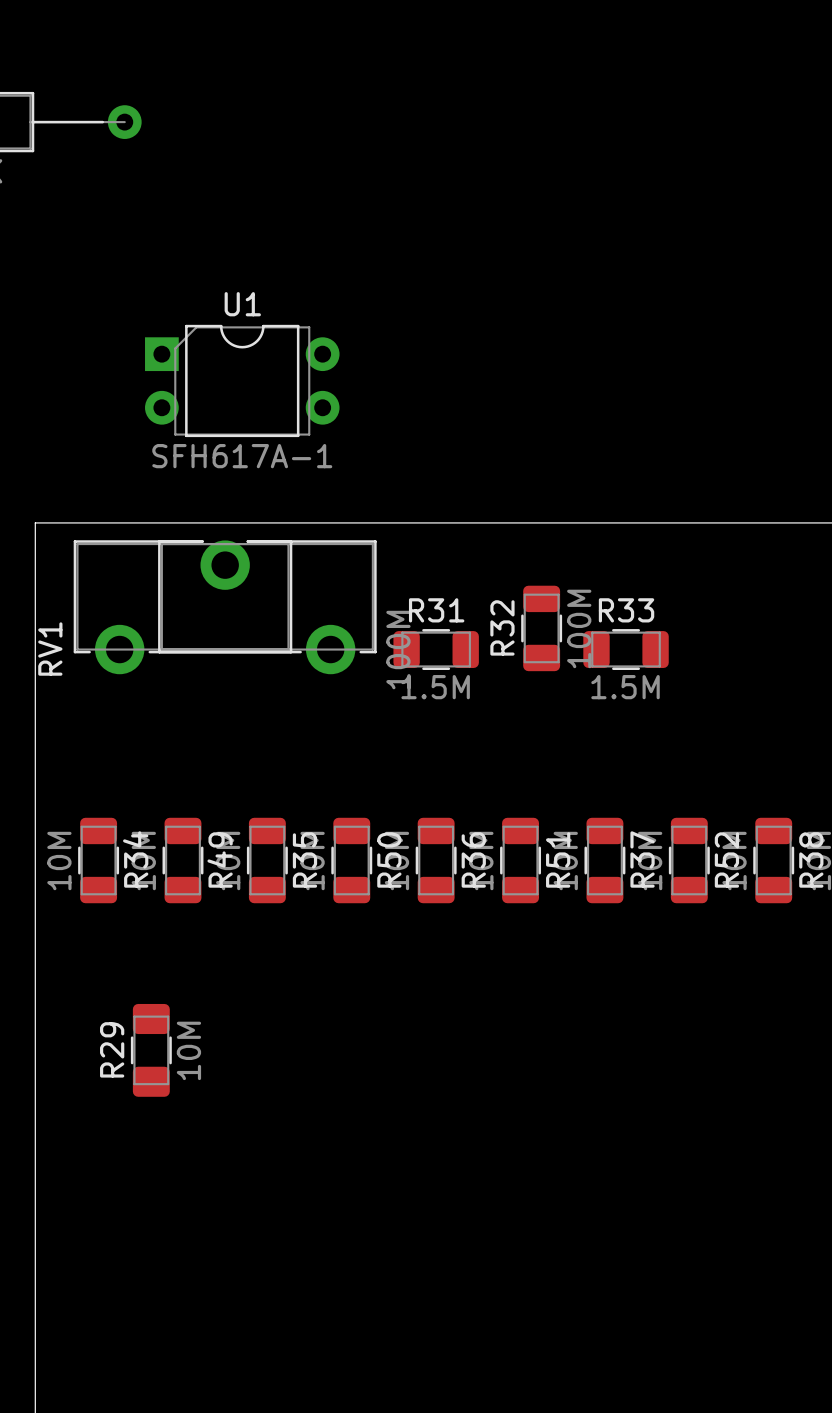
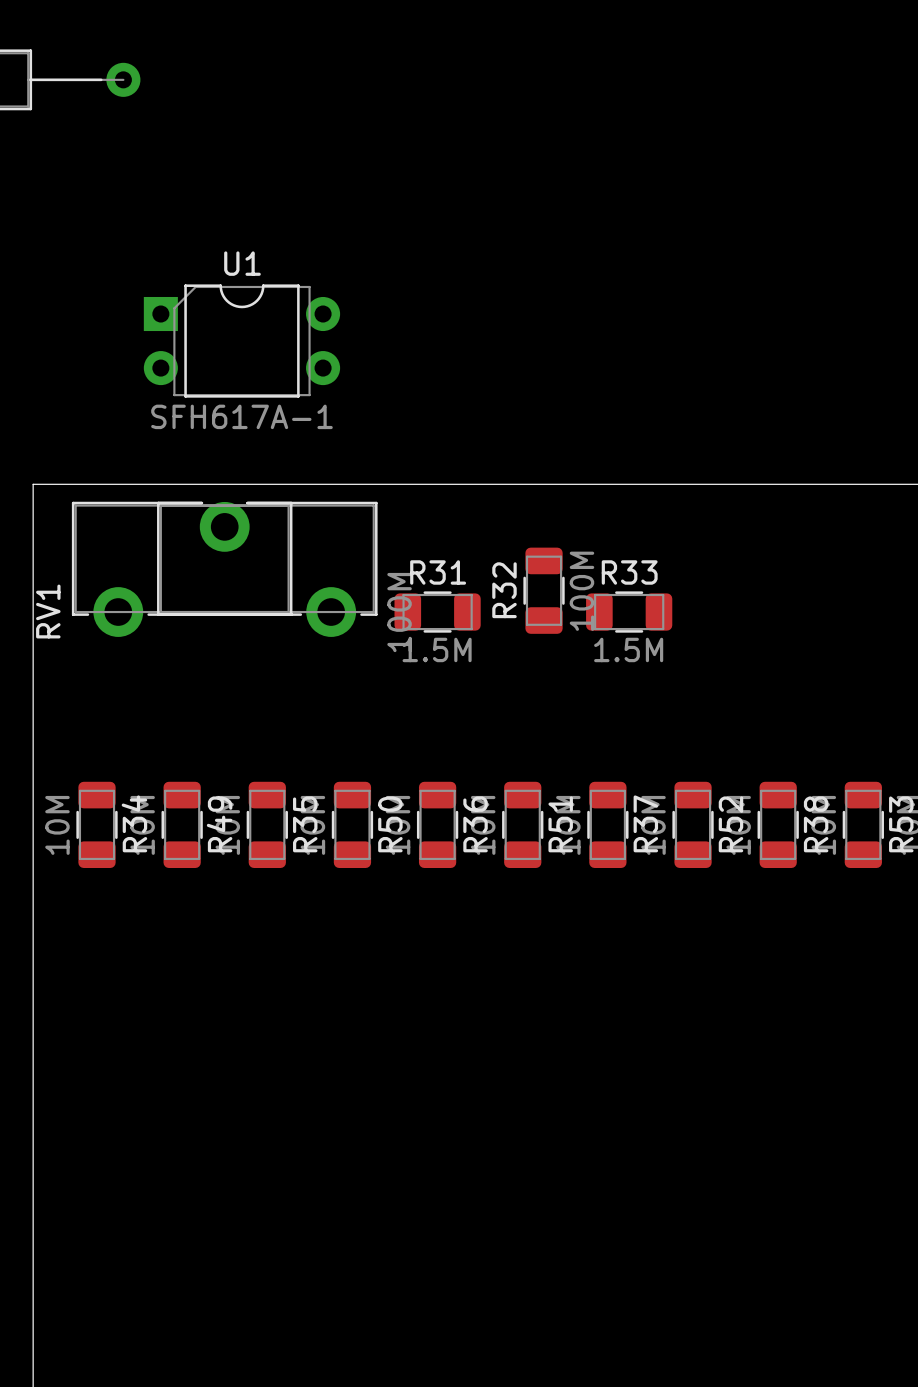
R29: 10M (151, 1050) -> none

